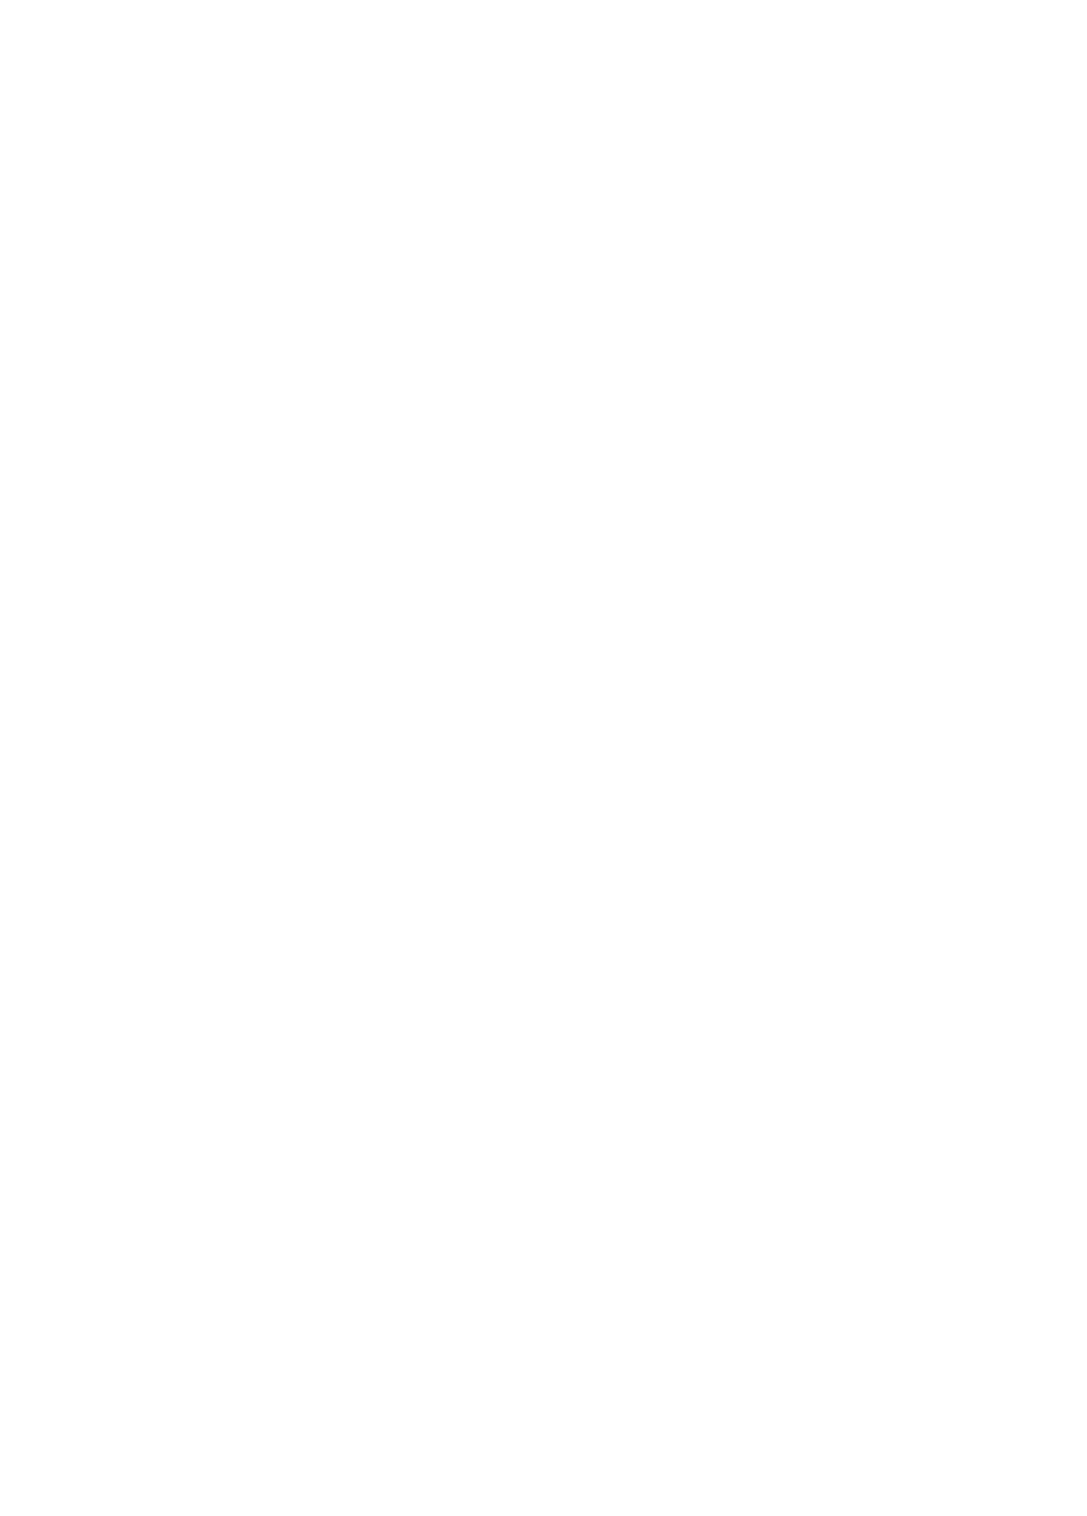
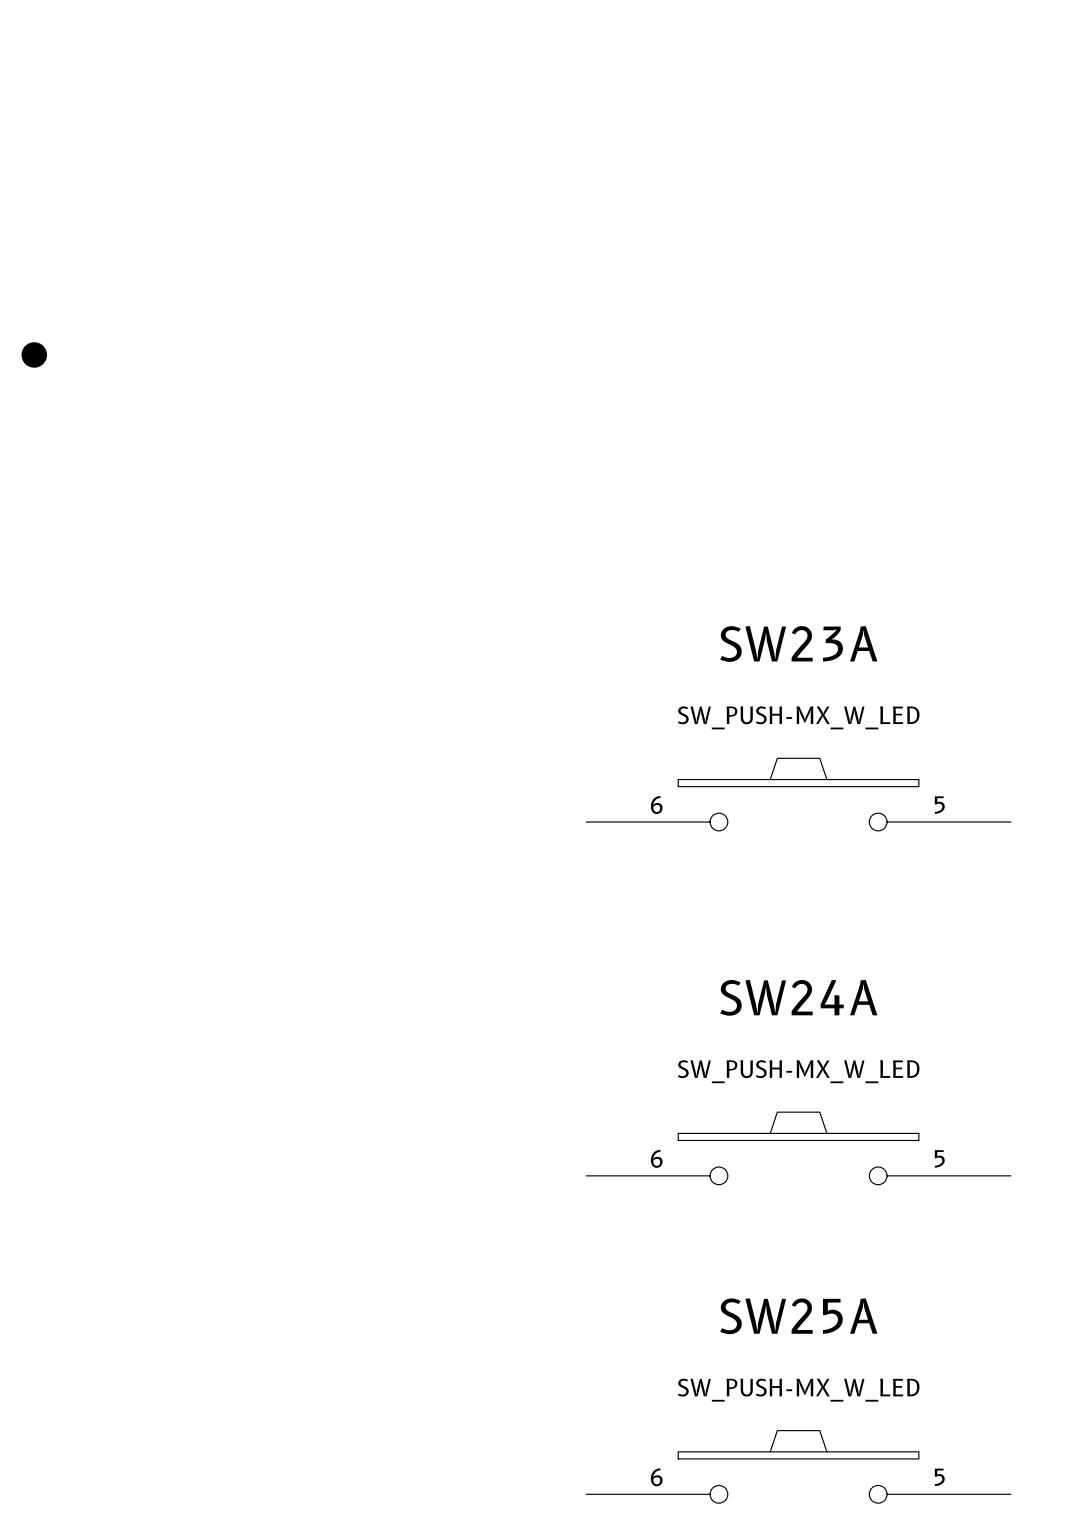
junction: none -> (34, 354)
SW23A: none -> SW_PUSH-MX_W_LED (798, 794)
SW24A: none -> SW_PUSH-MX_W_LED (798, 1148)
SW25A: none -> SW_PUSH-MX_W_LED (798, 1466)

